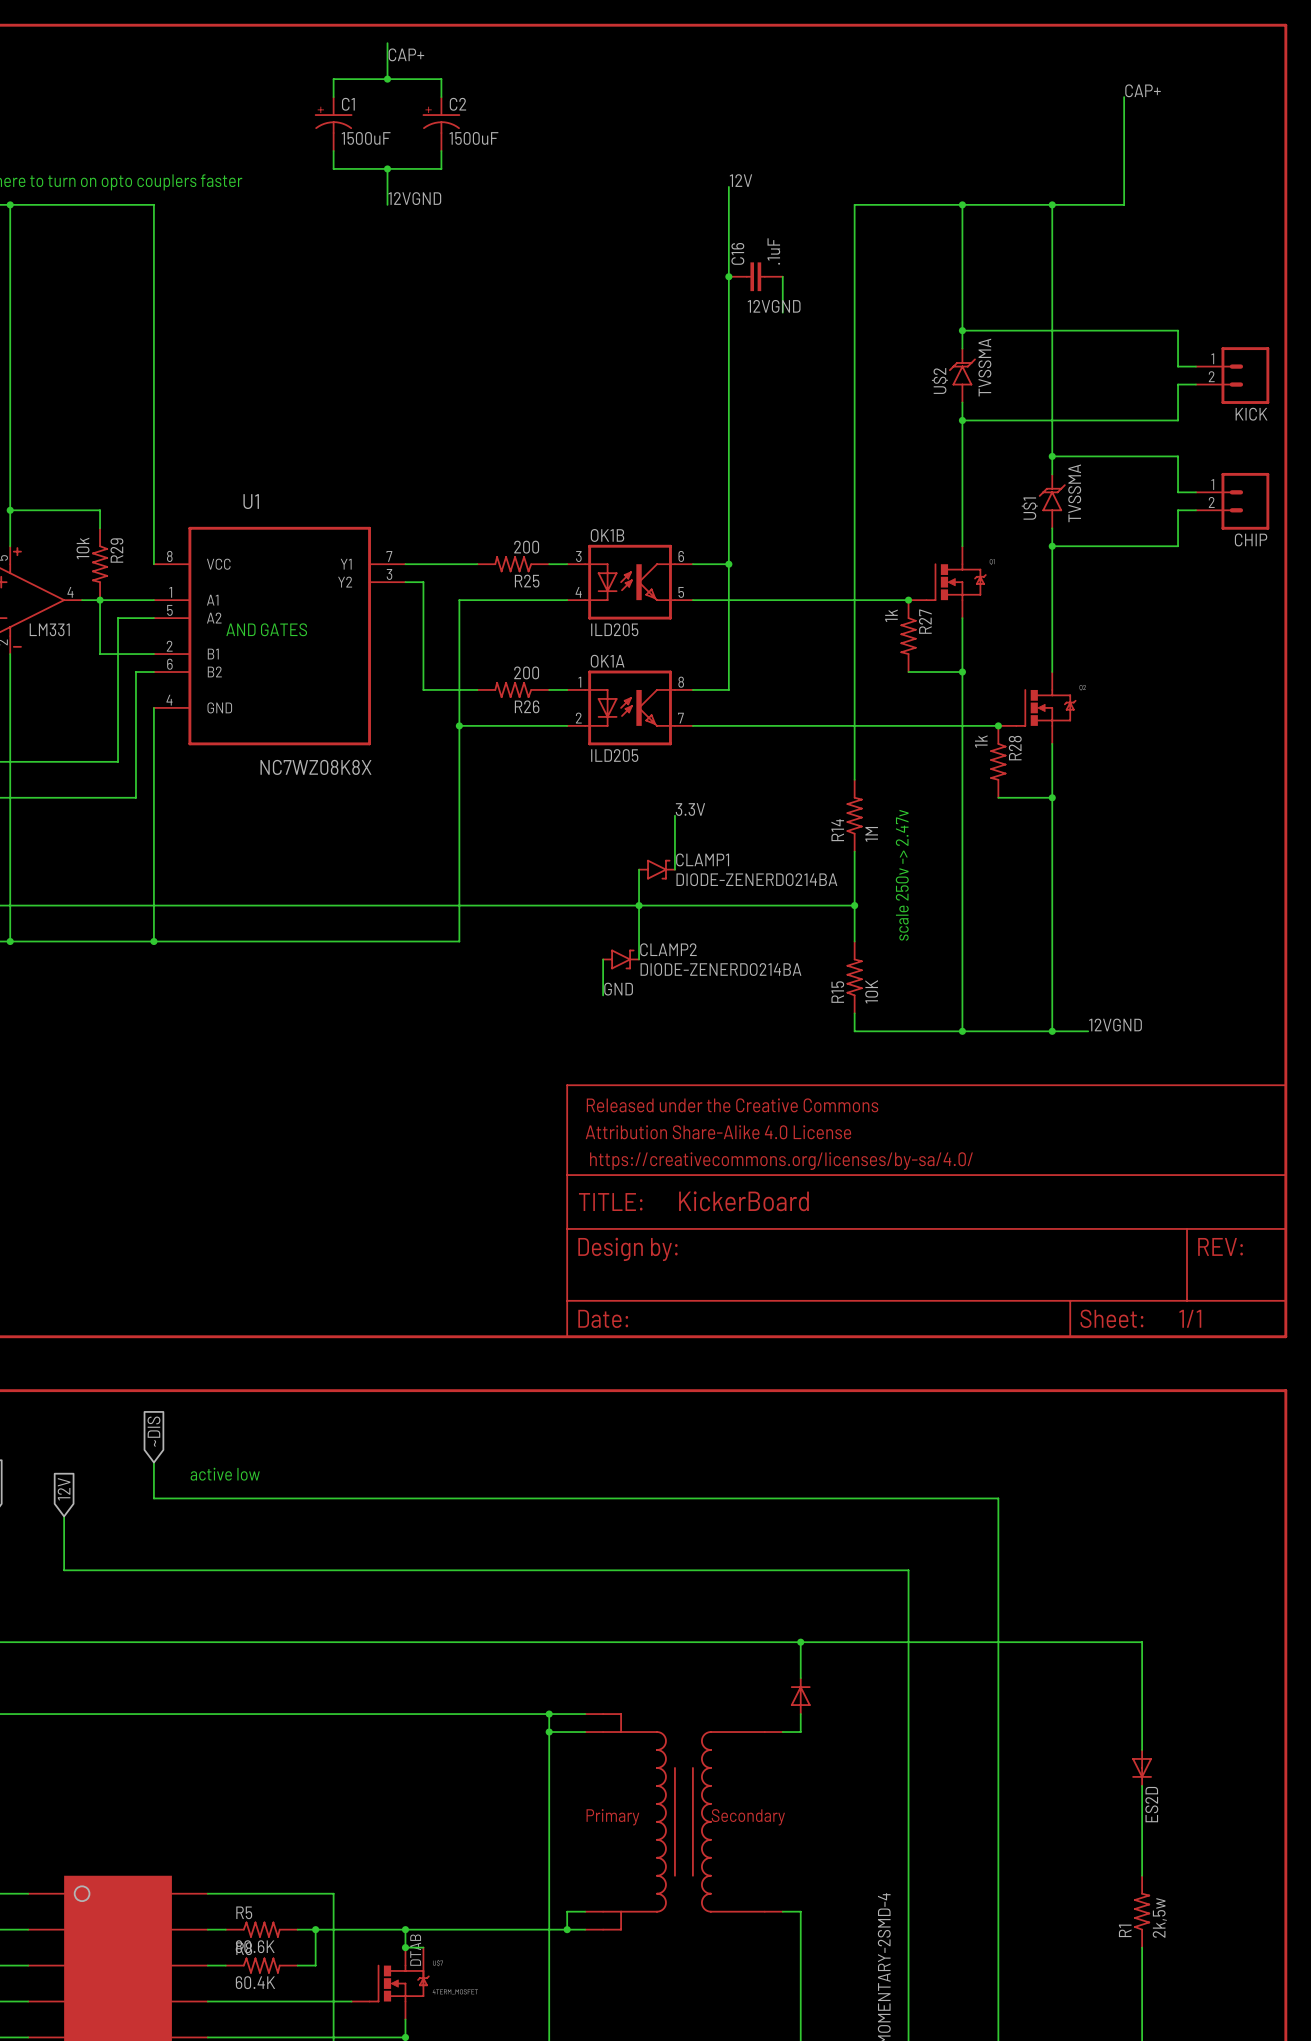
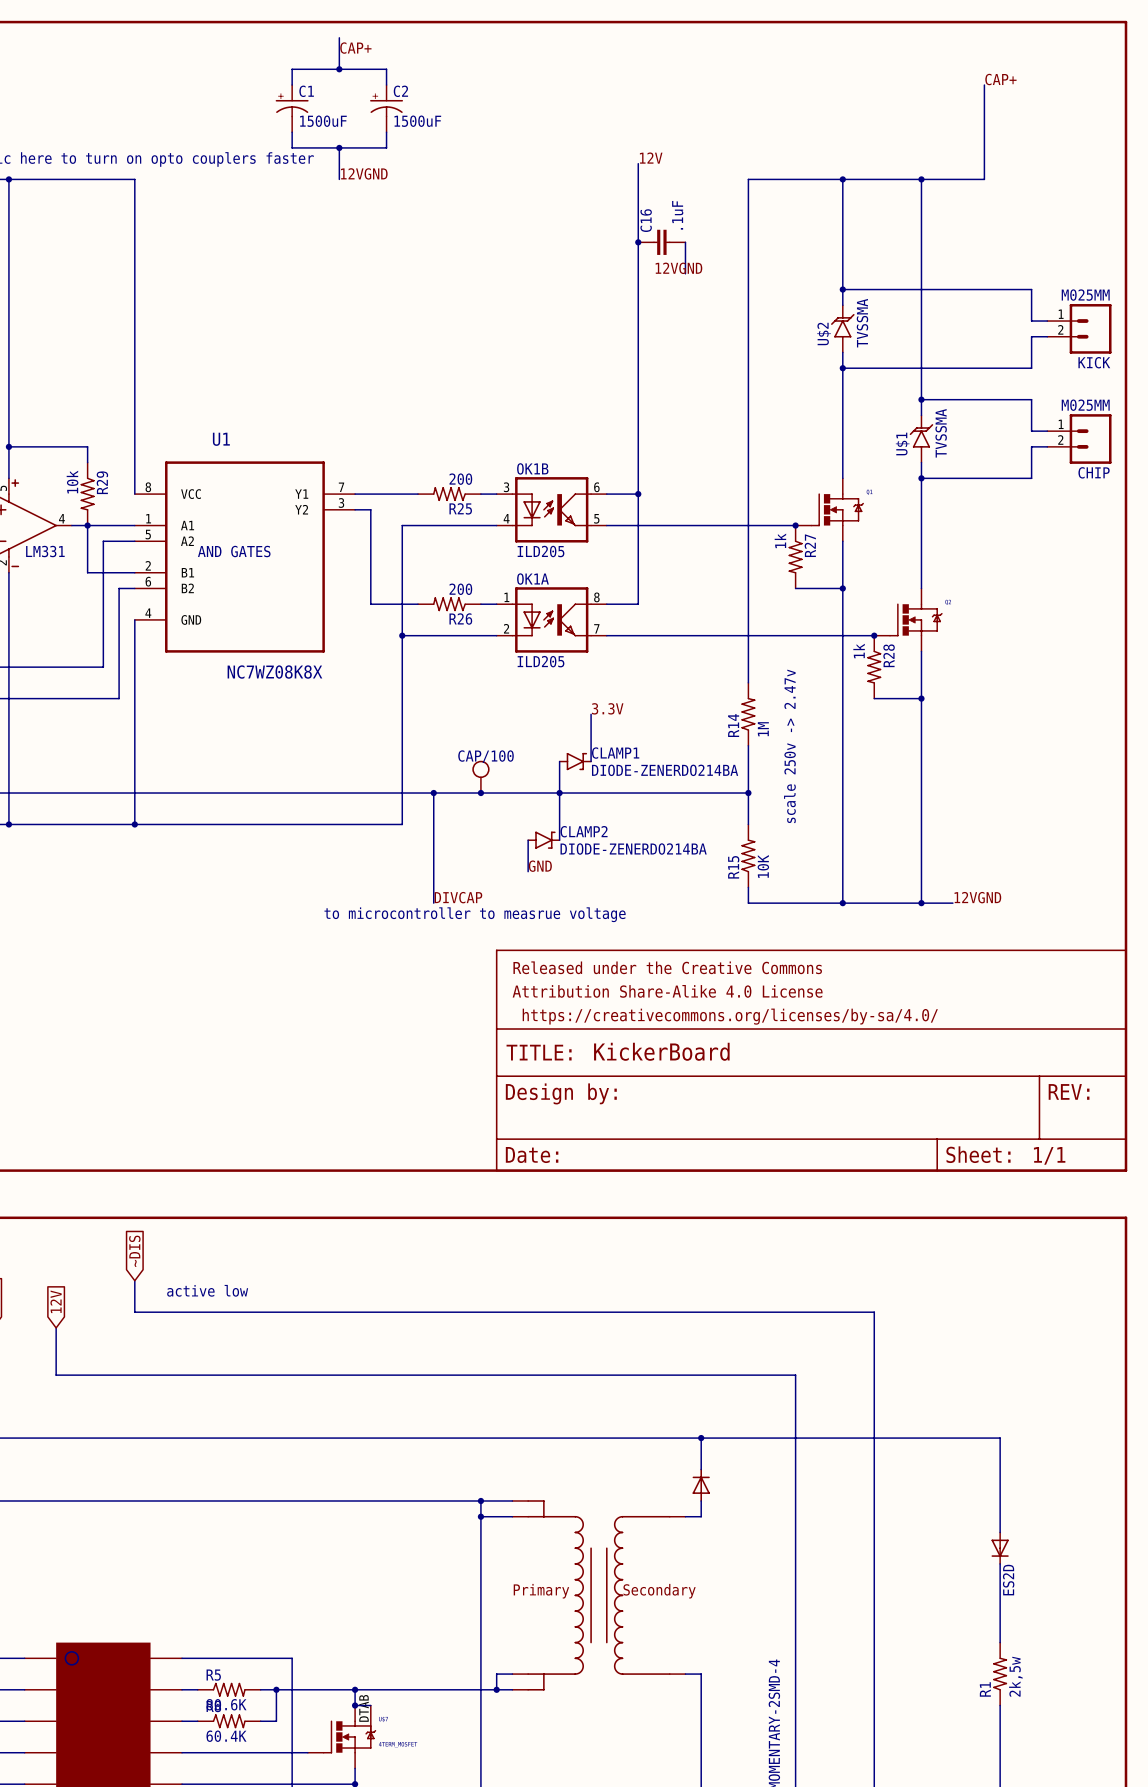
KICK value: none -> M025MM (1085, 295)
CHIP value: none -> M025MM (1085, 405)
CAP/100: none -> (480, 776)
wire: none -> (433, 793) (433, 903)
junction: none -> (433, 793)
junction: none -> (480, 793)
label: none -> DIVCAP (458, 897)
text: none -> to microcontroller to measrue voltage (475, 914)

